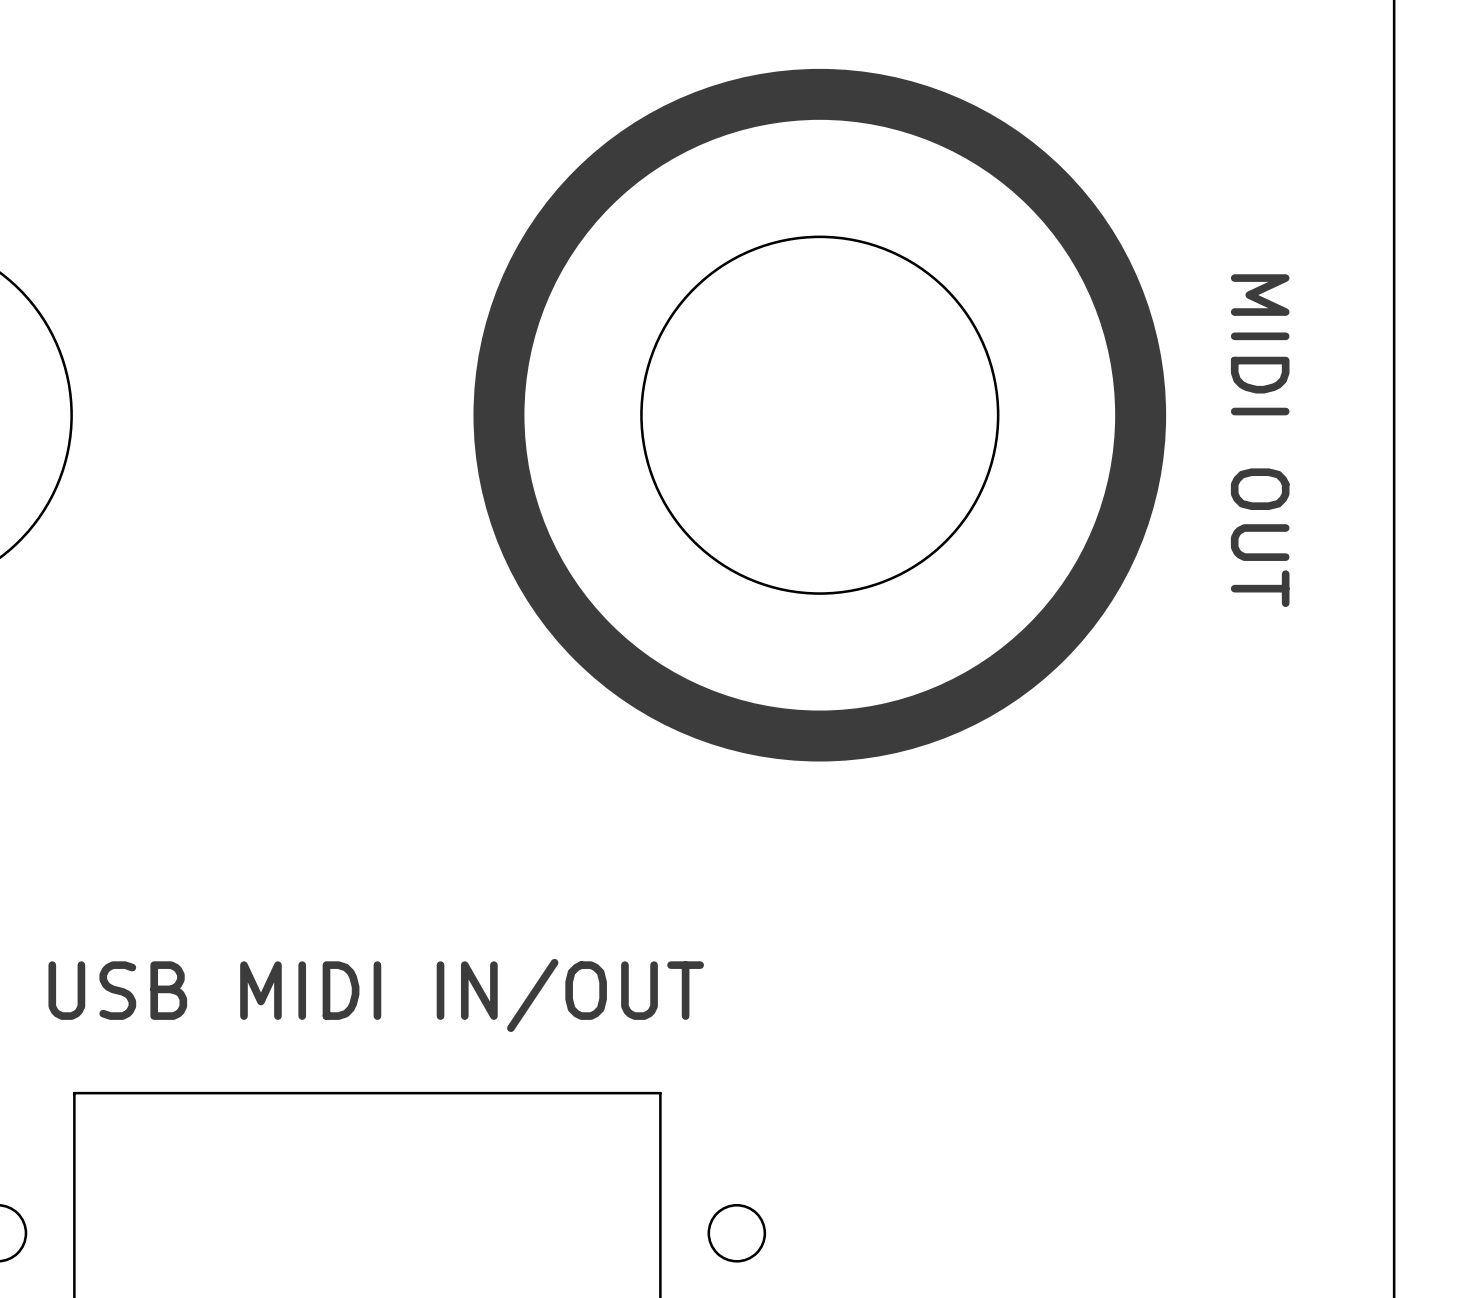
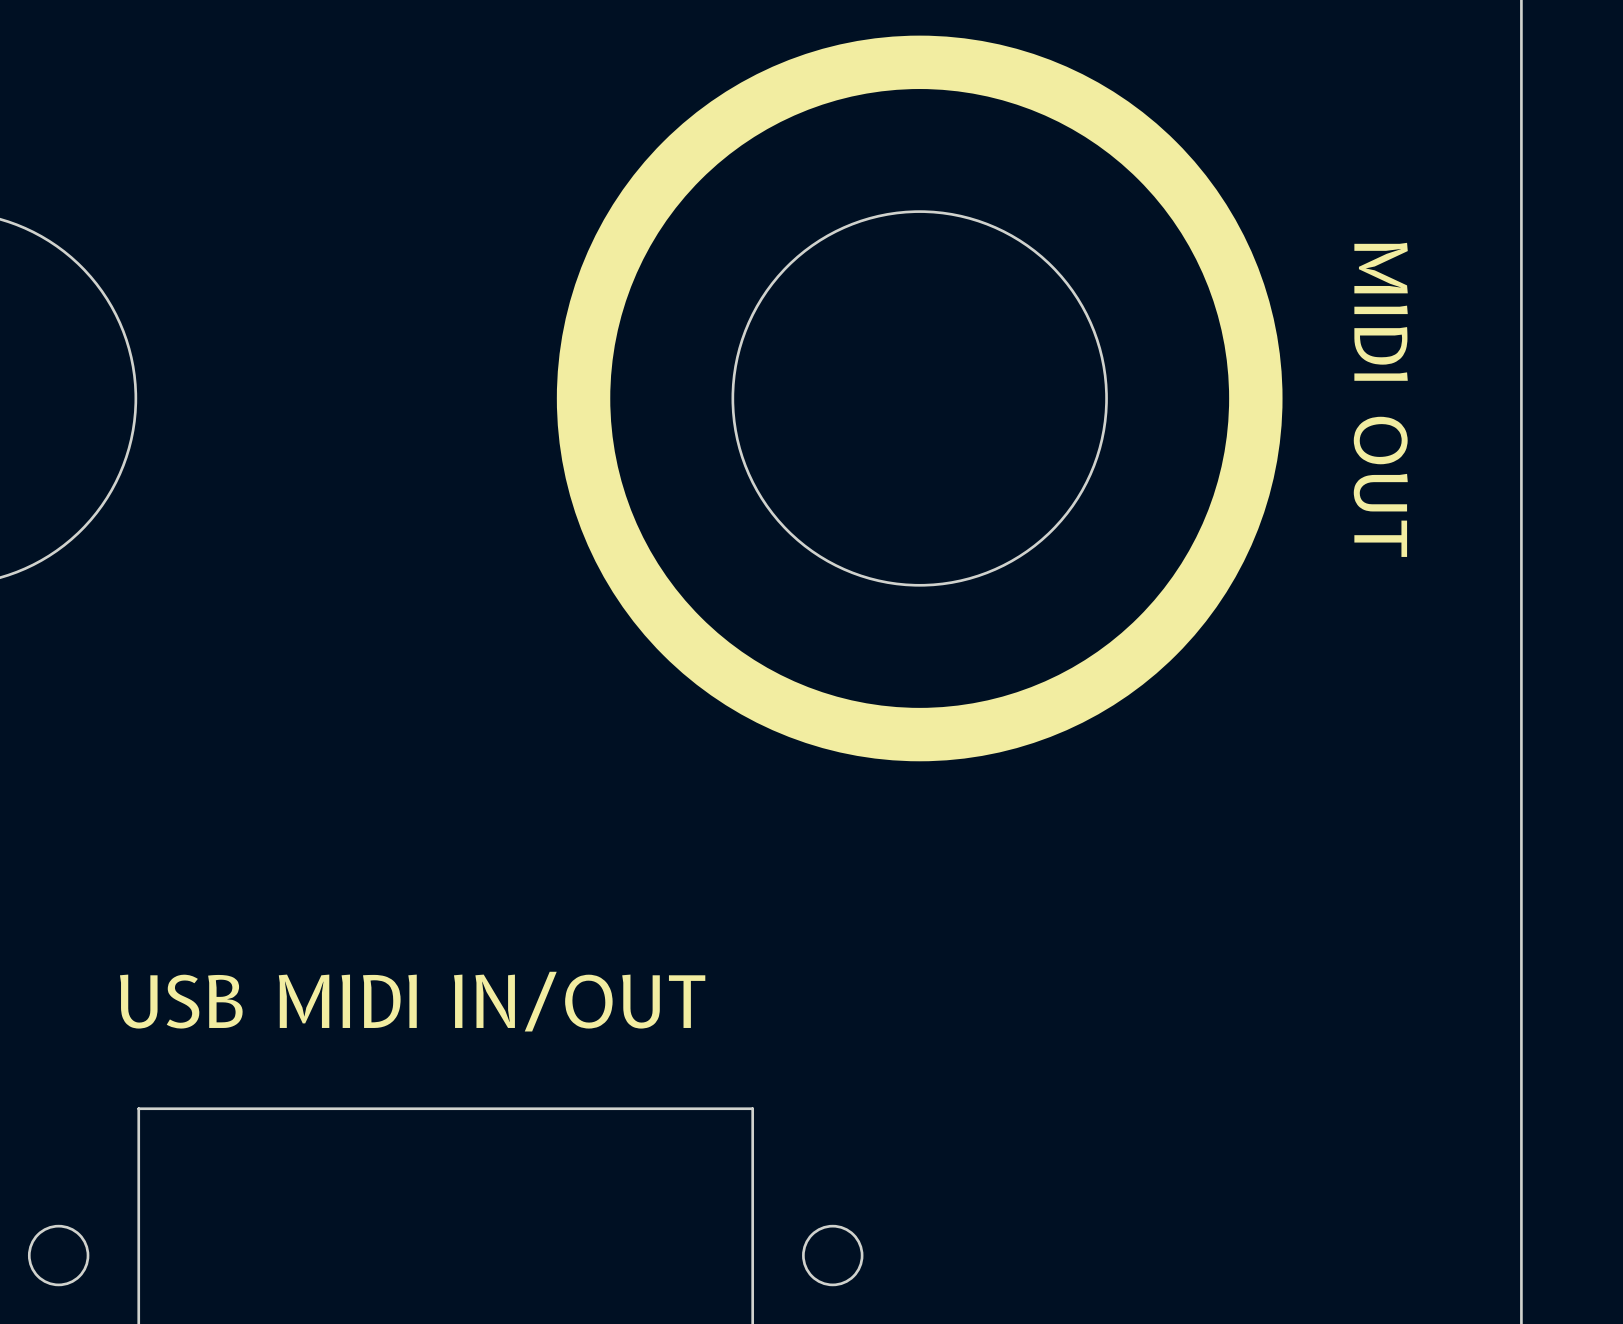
text position: USB MIDI IN/OUT (376, 995) -> USB MIDI IN/OUT (412, 1001)

